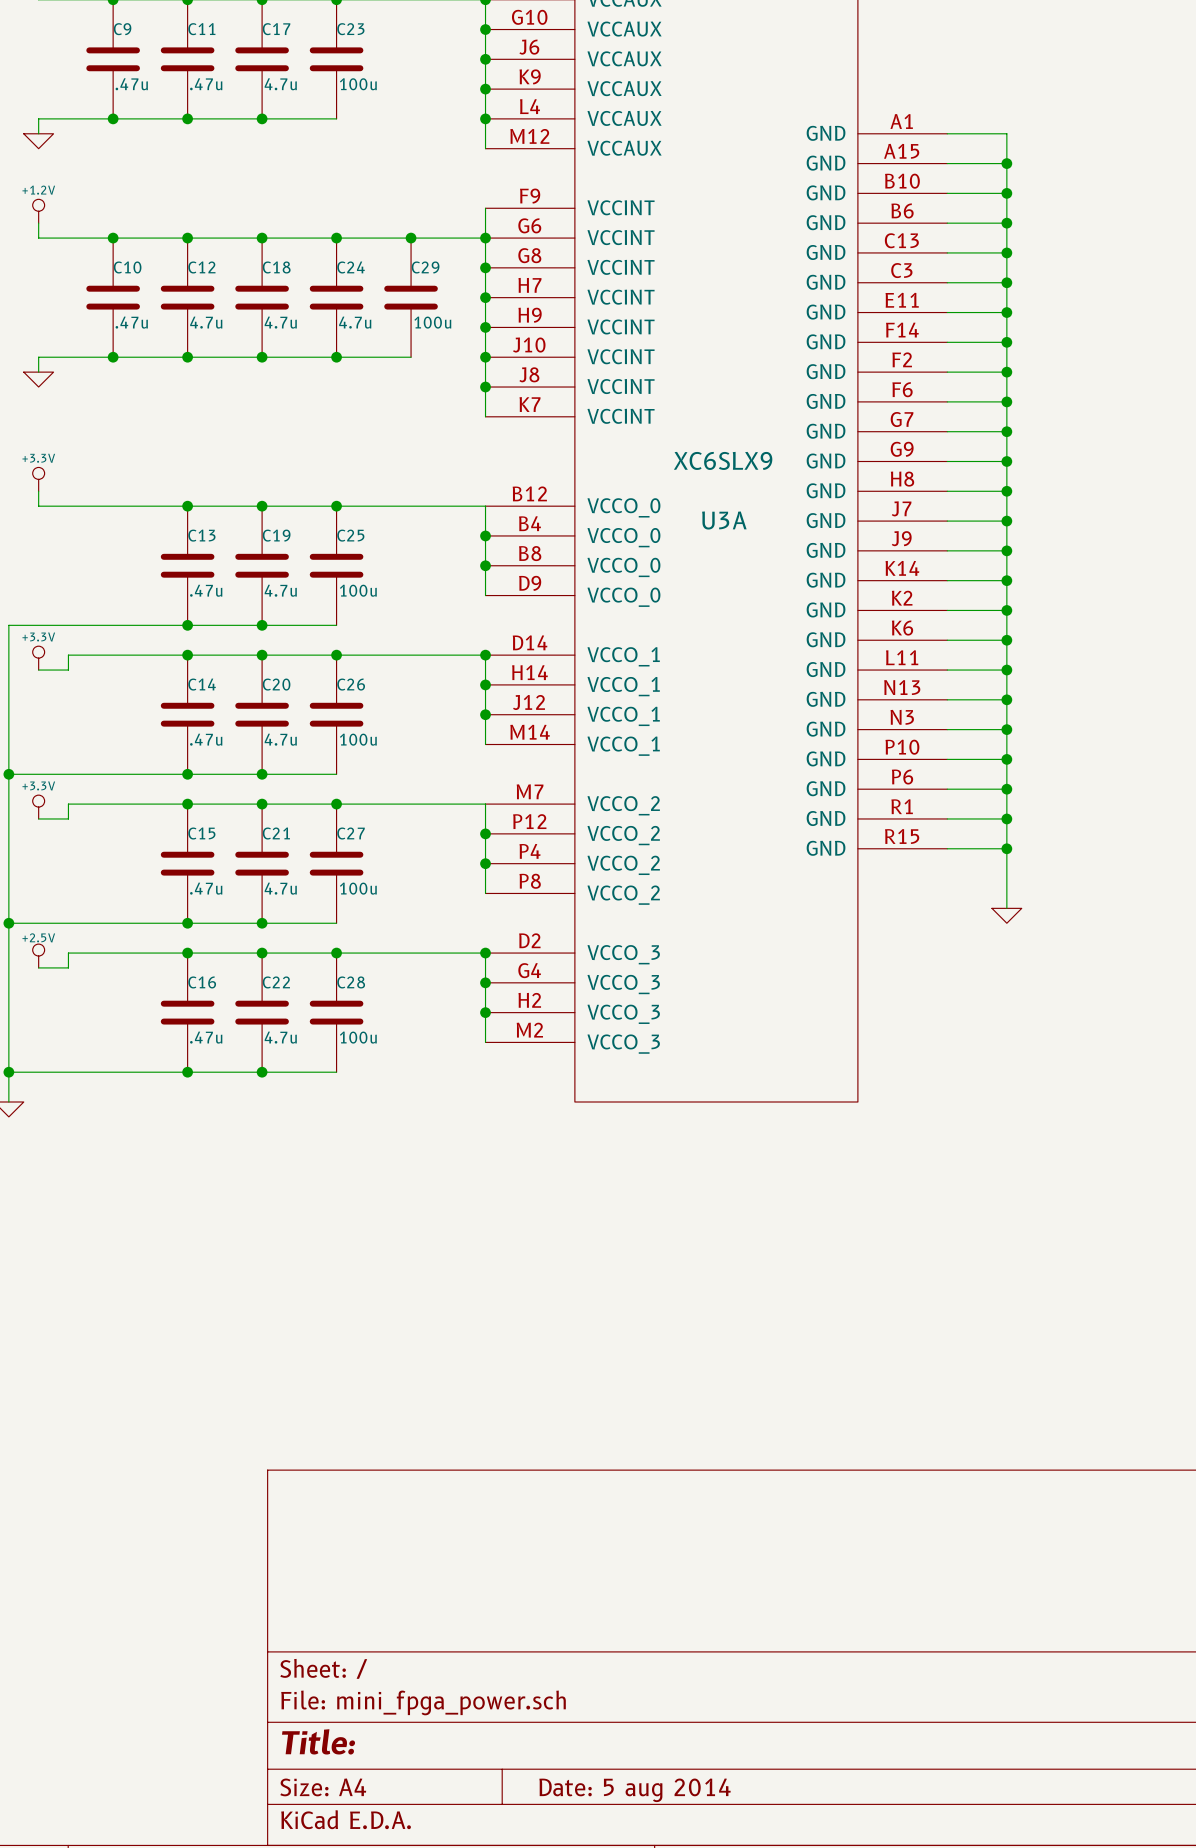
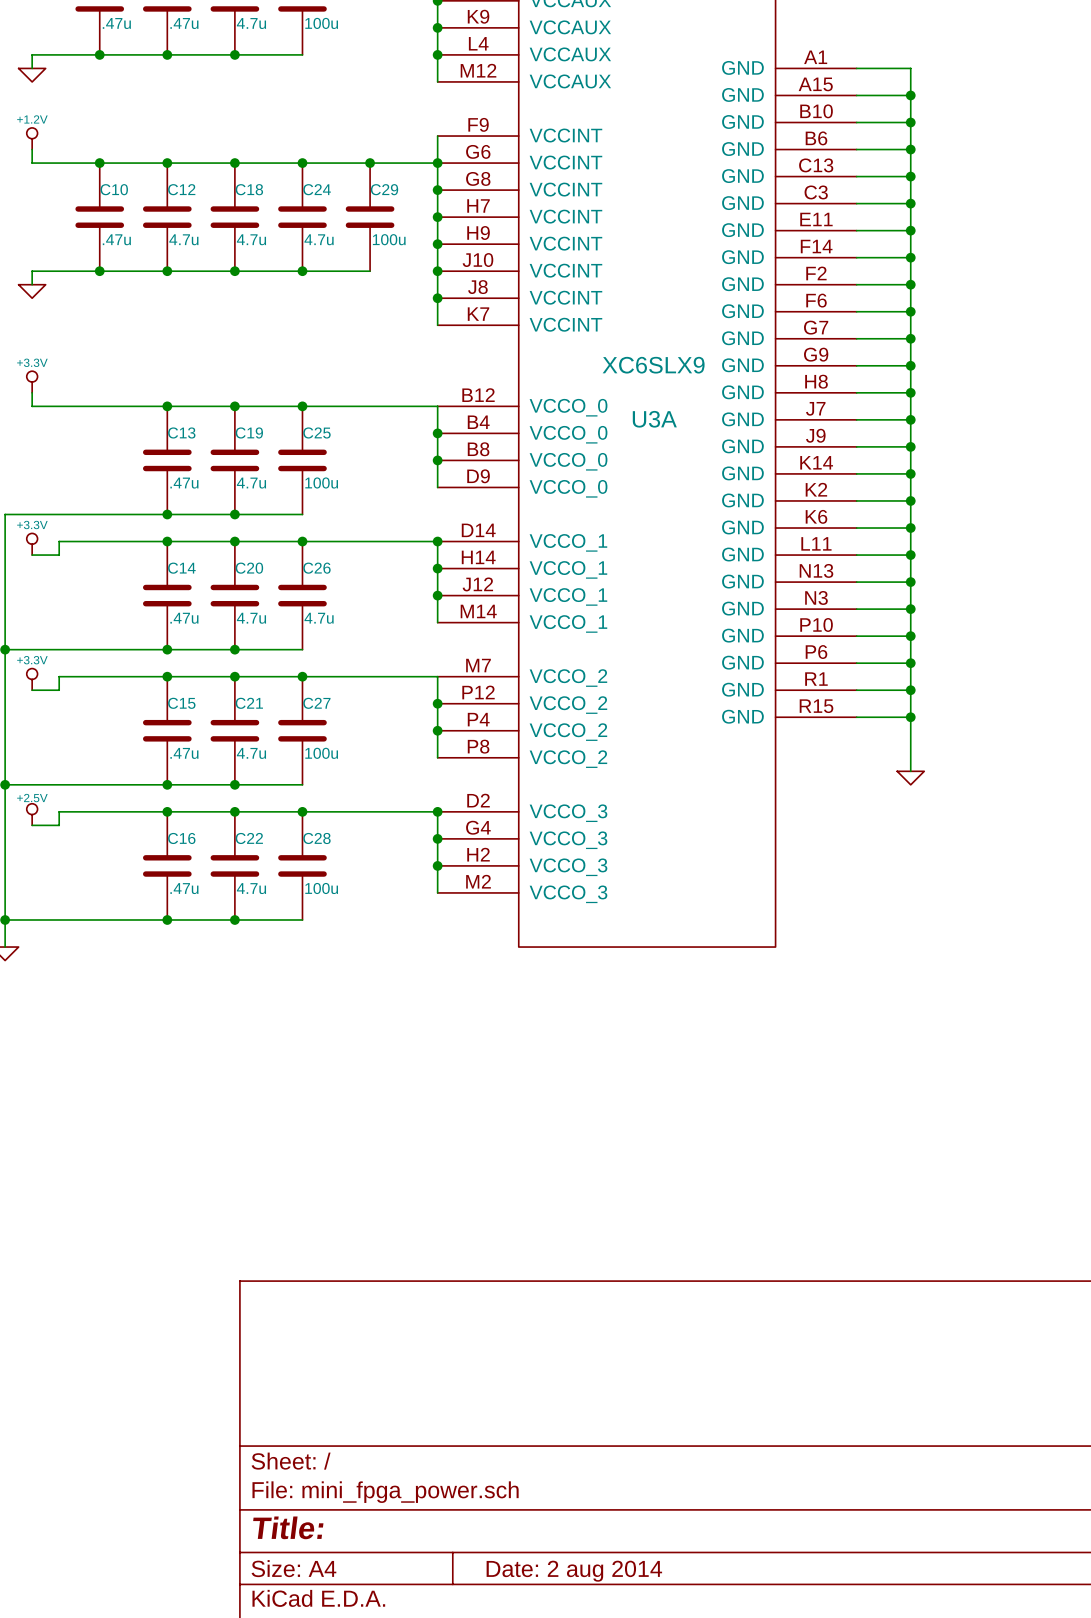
C26 value: 100u (358, 739) -> 4.7u (319, 618)
title block: Date: 5 aug 2014 (635, 1790) -> Date: 2 aug 2014 (574, 1571)

